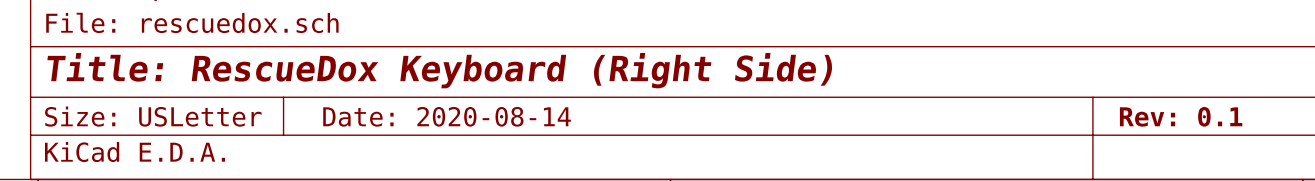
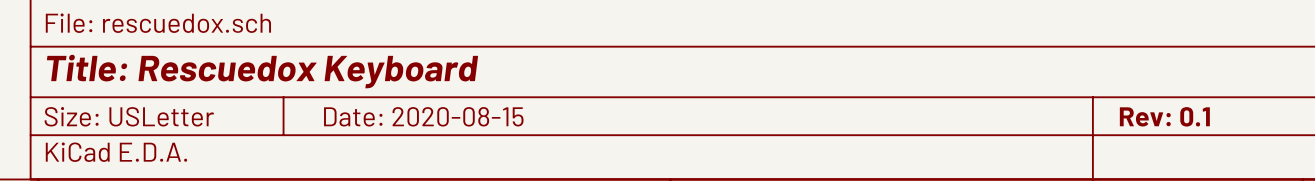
title block: Title: RescueDox Keyboard (Right Side) (439, 70) -> Title: Rescuedox Keyboard (262, 71)
title block: Date: 2020-08-14 (447, 116) -> Date: 2020-08-15 (423, 116)

